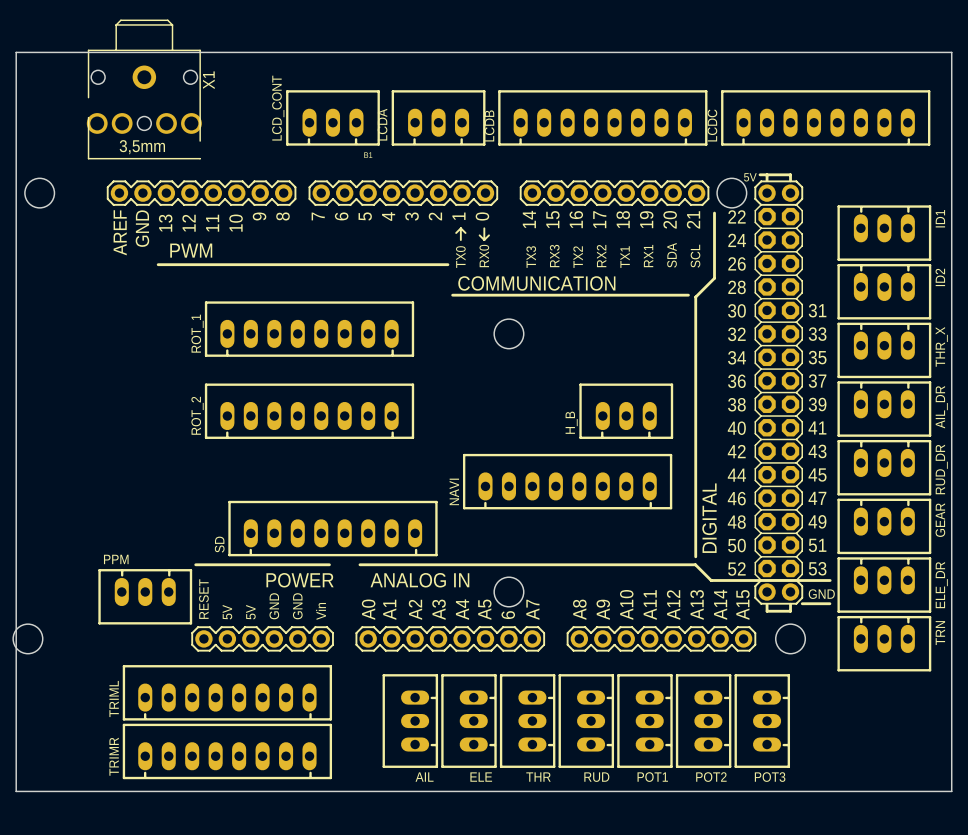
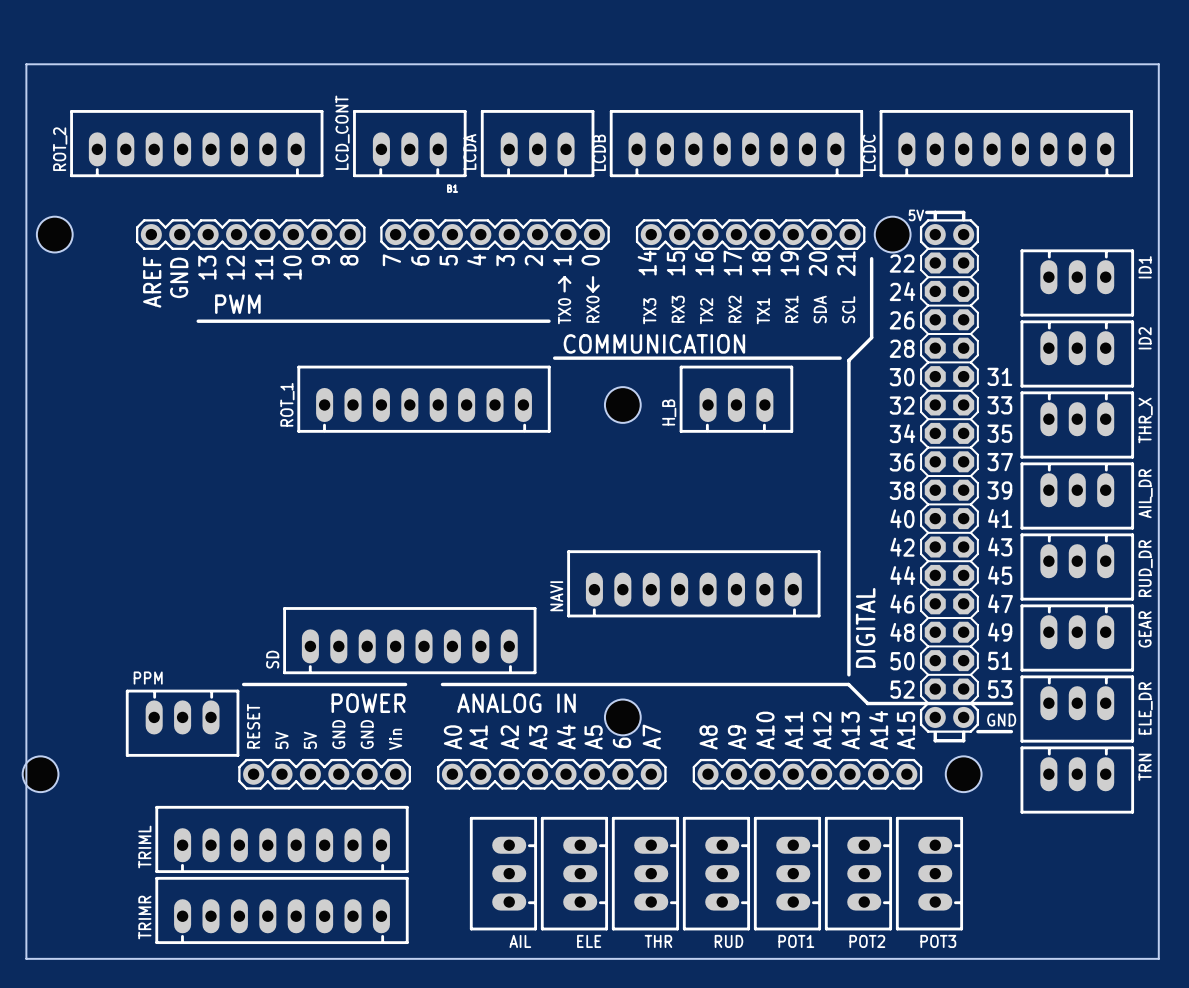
X1: (144, 89) -> none
ROT_1 position: (309, 329) -> (424, 399)
ROT_2 position: (309, 411) -> (196, 143)
H_B position: (626, 411) -> (736, 399)

